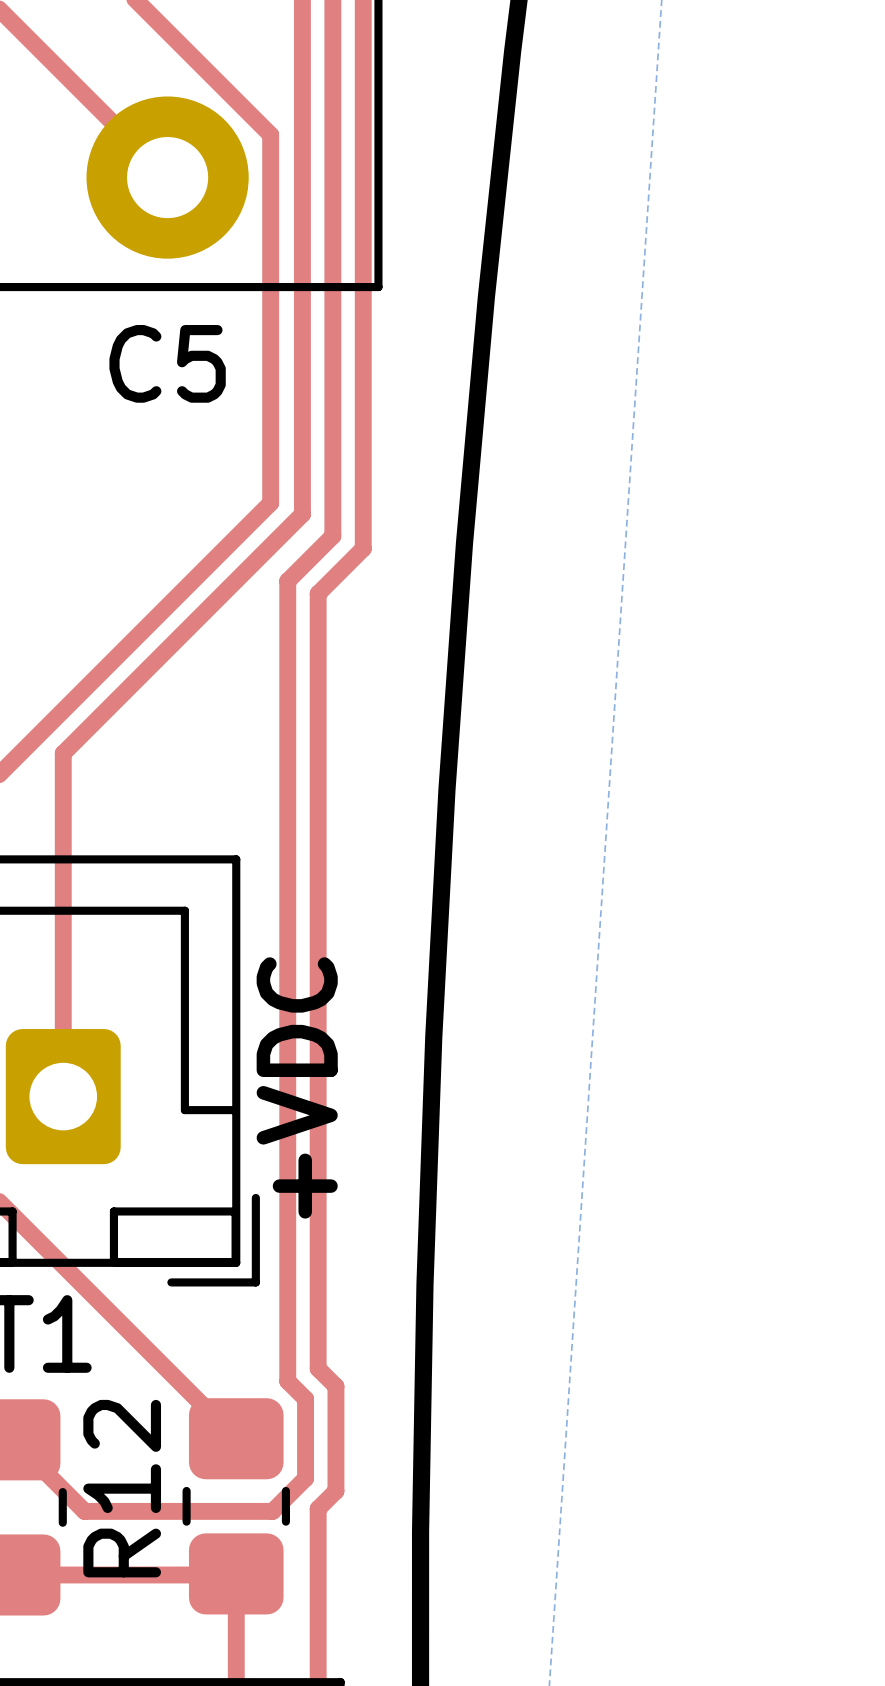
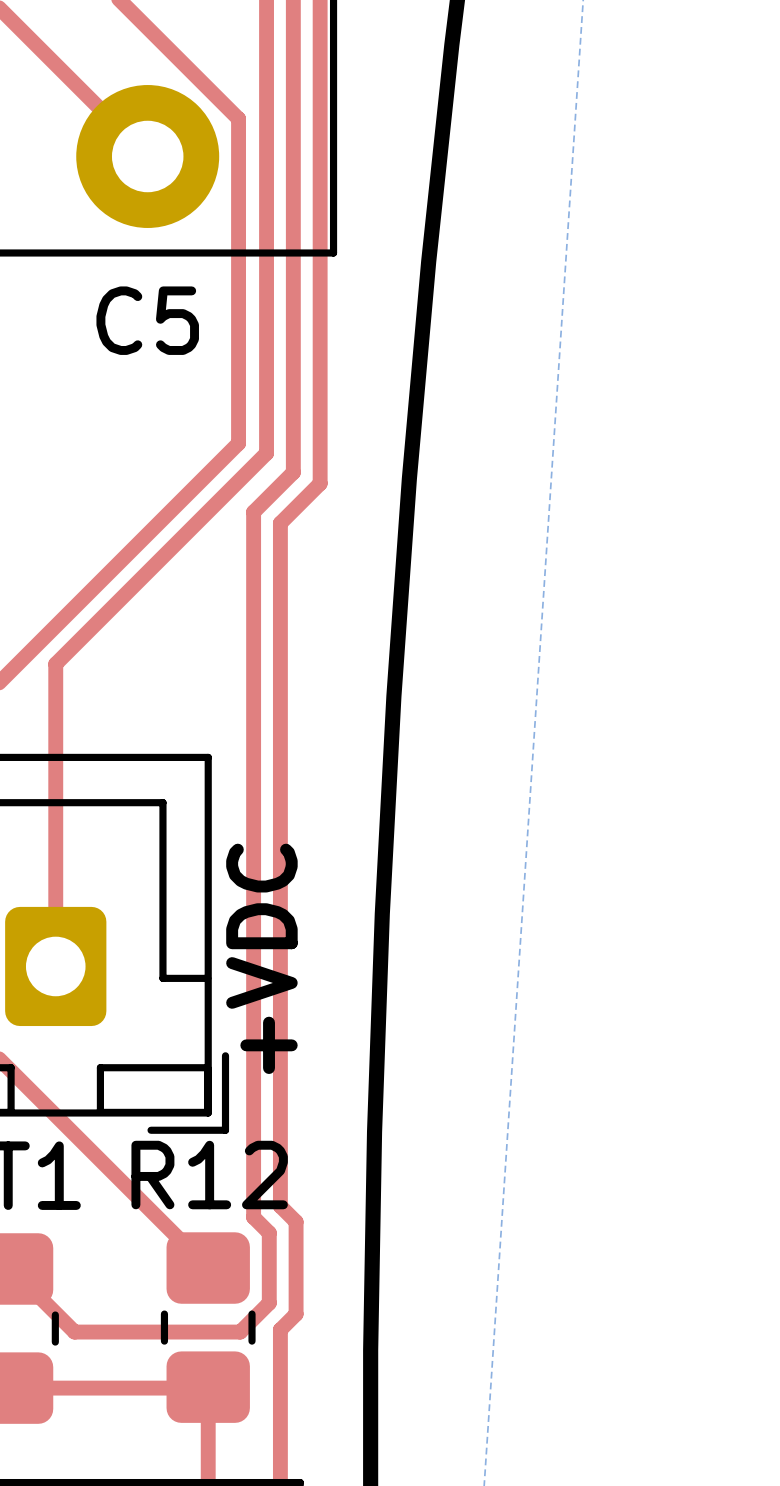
R12 name rotation: 0° (122, 1488) -> 90° clockwise (209, 1175)

